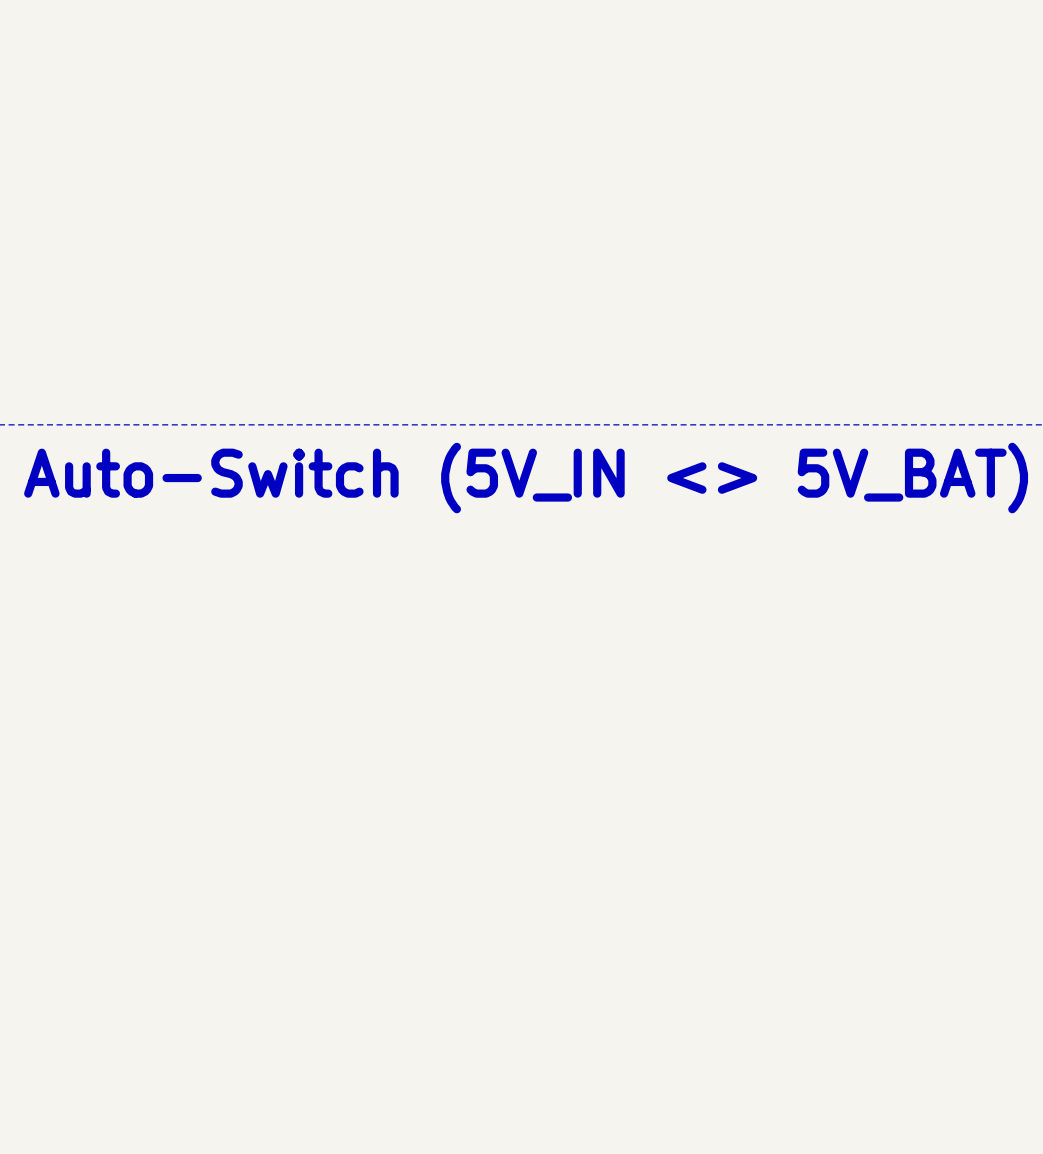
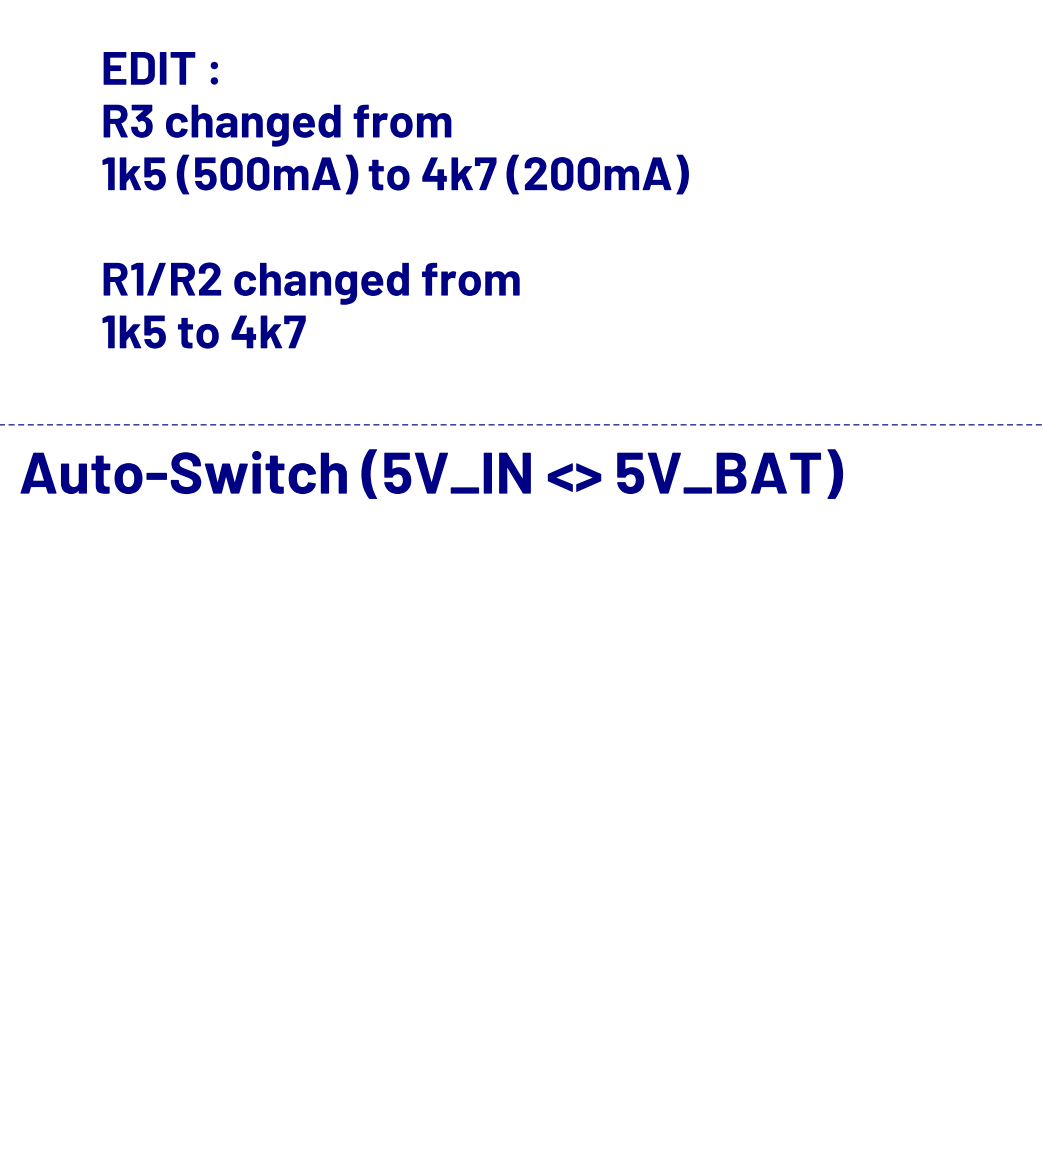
text: none -> EDIT : (160, 68)
text: none -> R3 changed from (277, 125)
text: none -> 1k5 (500mA) to 4k7 (200mA) (395, 174)
text: none -> R1/R2 changed from (311, 283)
text: none -> 1k5 to 4k7 (204, 332)

